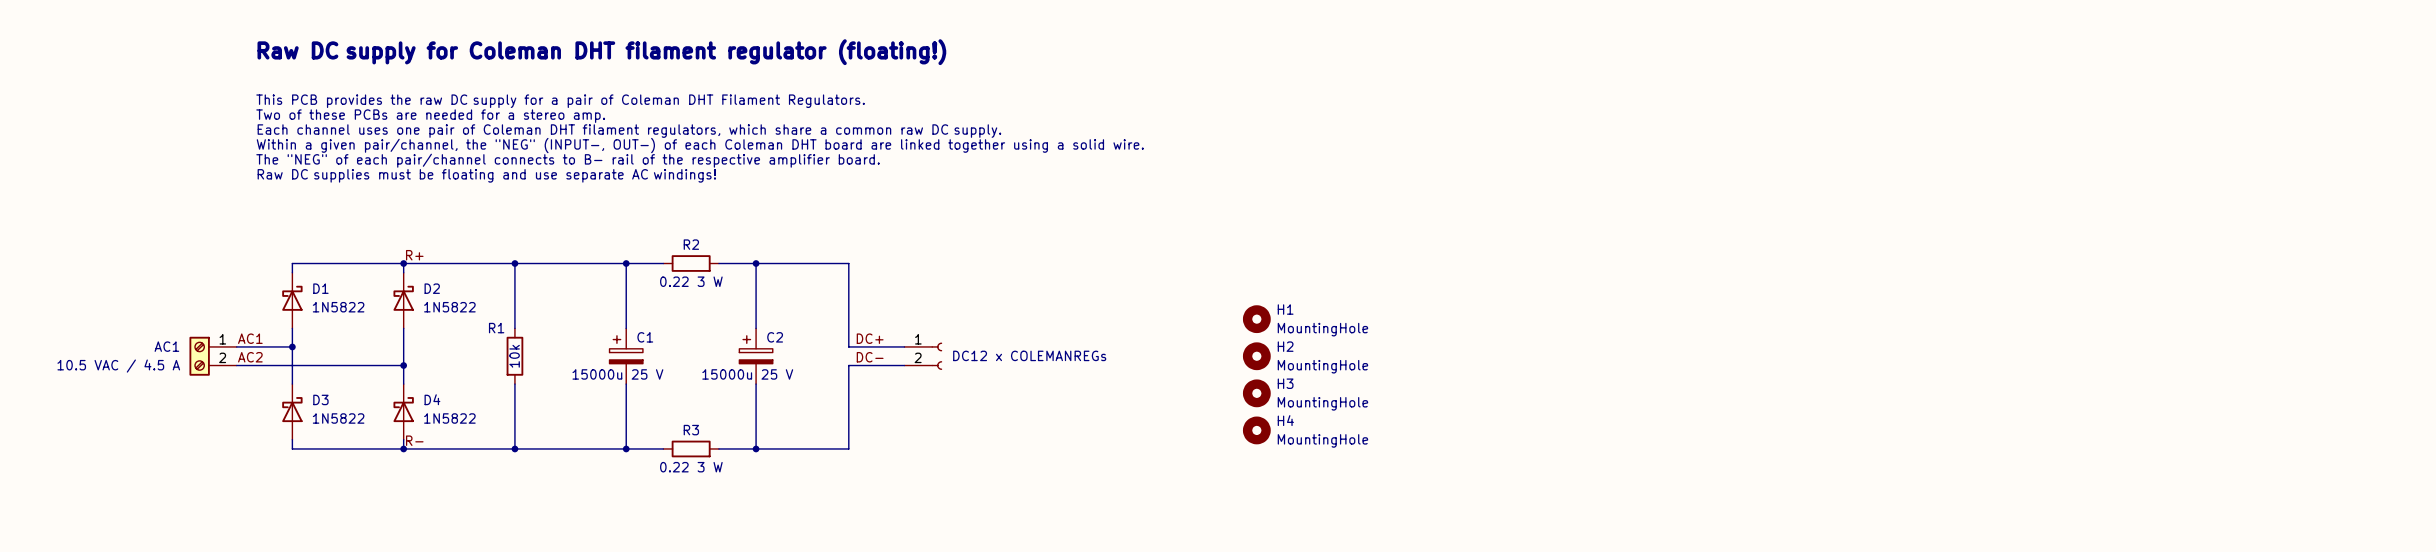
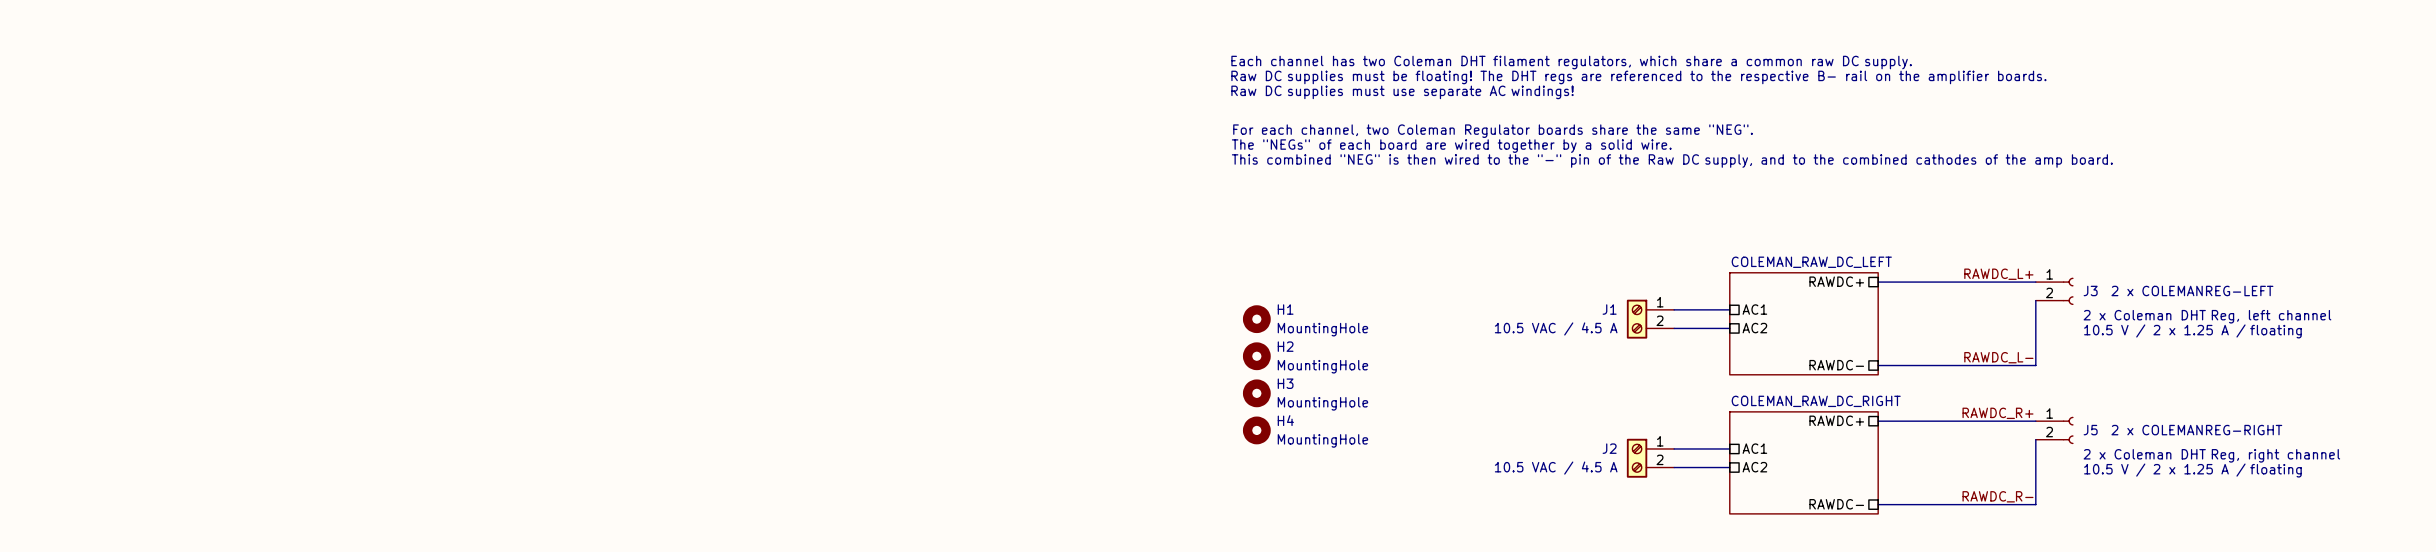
text: Raw DC supply for Coleman DHT filament regulator (floating!) (601, 52) -> none
text: none -> Each channel has two Coleman DHT filament regulators, which share a common raw DC supply. (1571, 62)
text: none -> Raw DC supplies must be floating! The DHT regs are referenced to the respective B- rail on the amplifier boards. (1638, 77)
text: none -> Raw DC supplies must use separate AC windings! (1402, 92)
text: This PCB provides the raw DC supply for a pair of Coleman DHT Filament Regulators. (560, 101) -> none
text: Two of these PCBs are needed for a stereo amp. (430, 116) -> none
text: Each channel uses one pair of Coleman DHT filament regulators, which share a common raw DC supply. (629, 131) -> none
text: none -> For each channel, two Coleman Regulator boards share the same "NEG". (1493, 131)
text: Within a given pair/channel, the "NEG" (INPUT-, OUT-) of each Coleman DHT board are linked together using a solid wire. (700, 145) -> none
text: none -> The "NEGs" of each board are wired together by a solid wire. (1451, 146)
text: The "NEG" of each pair/channel connects to B- rail of the respective amplifier board. (568, 160) -> none
text: none -> This combined "NEG" is then wired to the "-" pin of the Raw DC supply, and to the combined cathodes of the amp board. (1672, 161)
text: Raw DC supplies must be floating and use separate AC windings! (486, 175) -> none
label: R+ (414, 255) -> none
wire: (403, 263) (403, 272) -> none
junction: (403, 263) -> none
wire: (514, 263) (514, 328) -> none
junction: (514, 263) -> none
wire: (626, 263) (626, 328) -> none
junction: (626, 263) -> none
wire: (663, 263) (292, 263) (292, 272) -> none
R2: 0.22 3 W (691, 263) -> none
wire: (718, 263) (848, 263) (848, 346) (904, 346) -> none
wire: (756, 263) (756, 328) -> none
junction: (756, 263) -> none
label: none -> RAWDC_L+ (1998, 274)
sheet pin: none -> RAWDC+ (1836, 281)
wire: none -> (1878, 282) (2035, 282)
J3: none -> 2 x COLEMANREG-LEFT (2054, 291)
D1: 1N5822 (292, 300) -> none
D2: 1N5822 (403, 300) -> none
wire: none -> (2035, 300) (2035, 365) (1878, 365)
wire: none -> (1674, 309) (1729, 309)
sheet pin: none -> AC1 (1754, 309)
text: none -> 2 x Coleman DHT Reg, left channel (2207, 316)
J1: none -> 10.5 VAC / 4.5 A (1650, 319)
sheet COLEMAN_RAW_DC_LEFT: none -> (1803, 323)
wire: (292, 328) (292, 384) -> none
wire: (403, 328) (403, 384) -> none
wire: none -> (1674, 328) (1729, 328)
sheet pin: none -> AC2 (1754, 328)
text: none -> 10.5 V / 2 x 1.25 A / floating (2192, 331)
label: AC1 (250, 338) -> none
label: DC+ (870, 338) -> none
wire: (236, 346) (292, 346) -> none
junction: (292, 346) -> none
AC1: 10.5 VAC / 4.5 A (213, 356) -> none
R1: 10k (514, 356) -> none
C1: 15000u 25 V (626, 356) -> none
C2: 15000u 25 V (756, 356) -> none
DC1: 2 x COLEMANREGs (923, 356) -> none
label: AC2 (250, 357) -> none
label: DC- (870, 357) -> none
label: none -> RAWDC_L- (1998, 357)
wire: (236, 365) (403, 365) -> none
junction: (403, 365) -> none
wire: (904, 365) (848, 365) (848, 448) (718, 448) -> none
sheet pin: none -> RAWDC- (1836, 365)
wire: (514, 384) (514, 448) -> none
wire: (626, 384) (626, 448) -> none
wire: (756, 384) (756, 448) -> none
D3: 1N5822 (292, 411) -> none
D4: 1N5822 (403, 411) -> none
label: none -> RAWDC_R+ (1997, 413)
sheet pin: none -> RAWDC+ (1836, 420)
wire: none -> (1878, 421) (2035, 421)
J5: none -> 2 x COLEMANREG-RIGHT (2054, 430)
wire: (292, 439) (292, 448) (663, 448) -> none
wire: (403, 439) (403, 448) -> none
wire: none -> (2035, 439) (2035, 504) (1878, 504)
label: R- (414, 440) -> none
junction: (403, 448) -> none
junction: (514, 448) -> none
junction: (626, 448) -> none
R3: 0.22 3 W (691, 448) -> none
junction: (756, 448) -> none
wire: none -> (1674, 448) (1729, 448)
sheet pin: none -> AC1 (1754, 448)
text: none -> 2 x Coleman DHT Reg, right channel (2211, 455)
J2: none -> 10.5 VAC / 4.5 A (1650, 458)
sheet COLEMAN_RAW_DC_RIGHT: none -> (1803, 462)
wire: none -> (1674, 467) (1729, 467)
sheet pin: none -> AC2 (1754, 467)
text: none -> 10.5 V / 2 x 1.25 A / floating (2192, 470)
label: none -> RAWDC_R- (1997, 496)
sheet pin: none -> RAWDC- (1836, 504)

